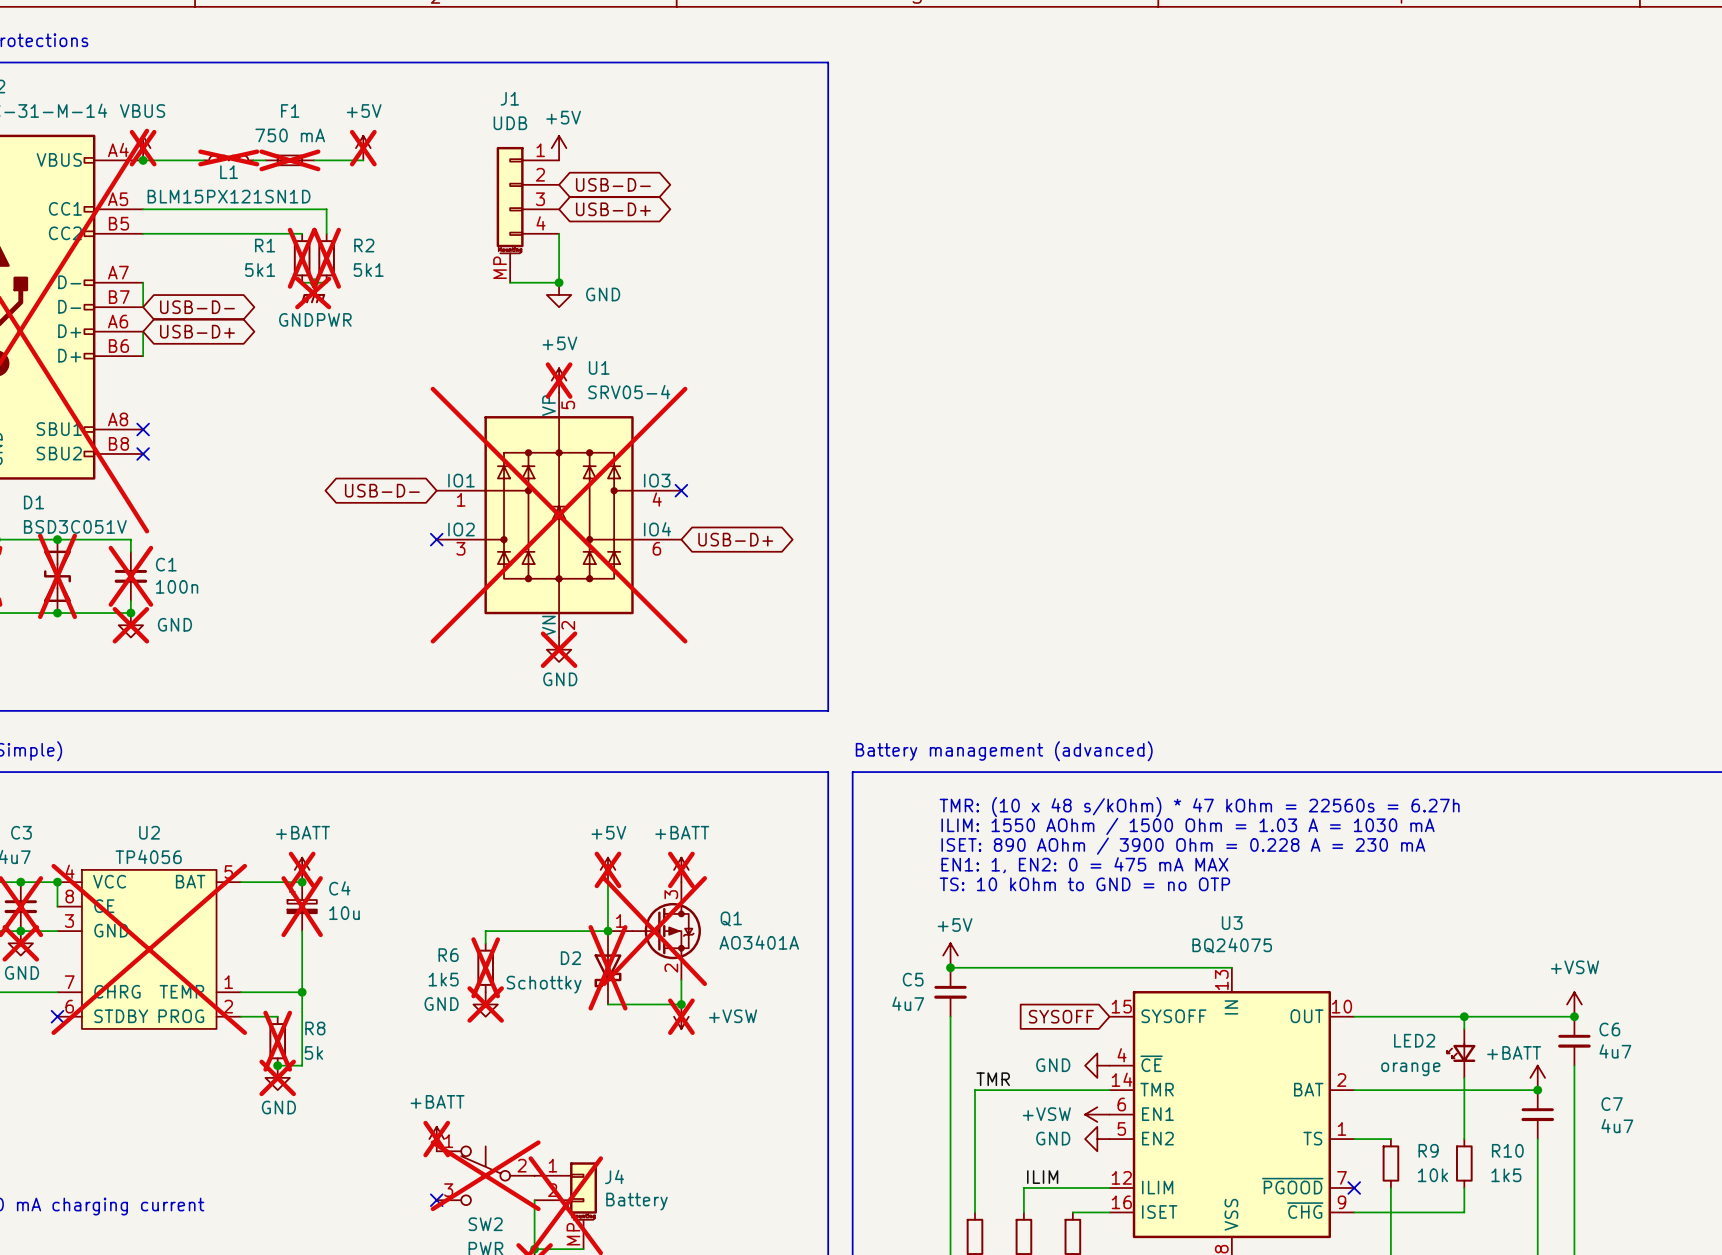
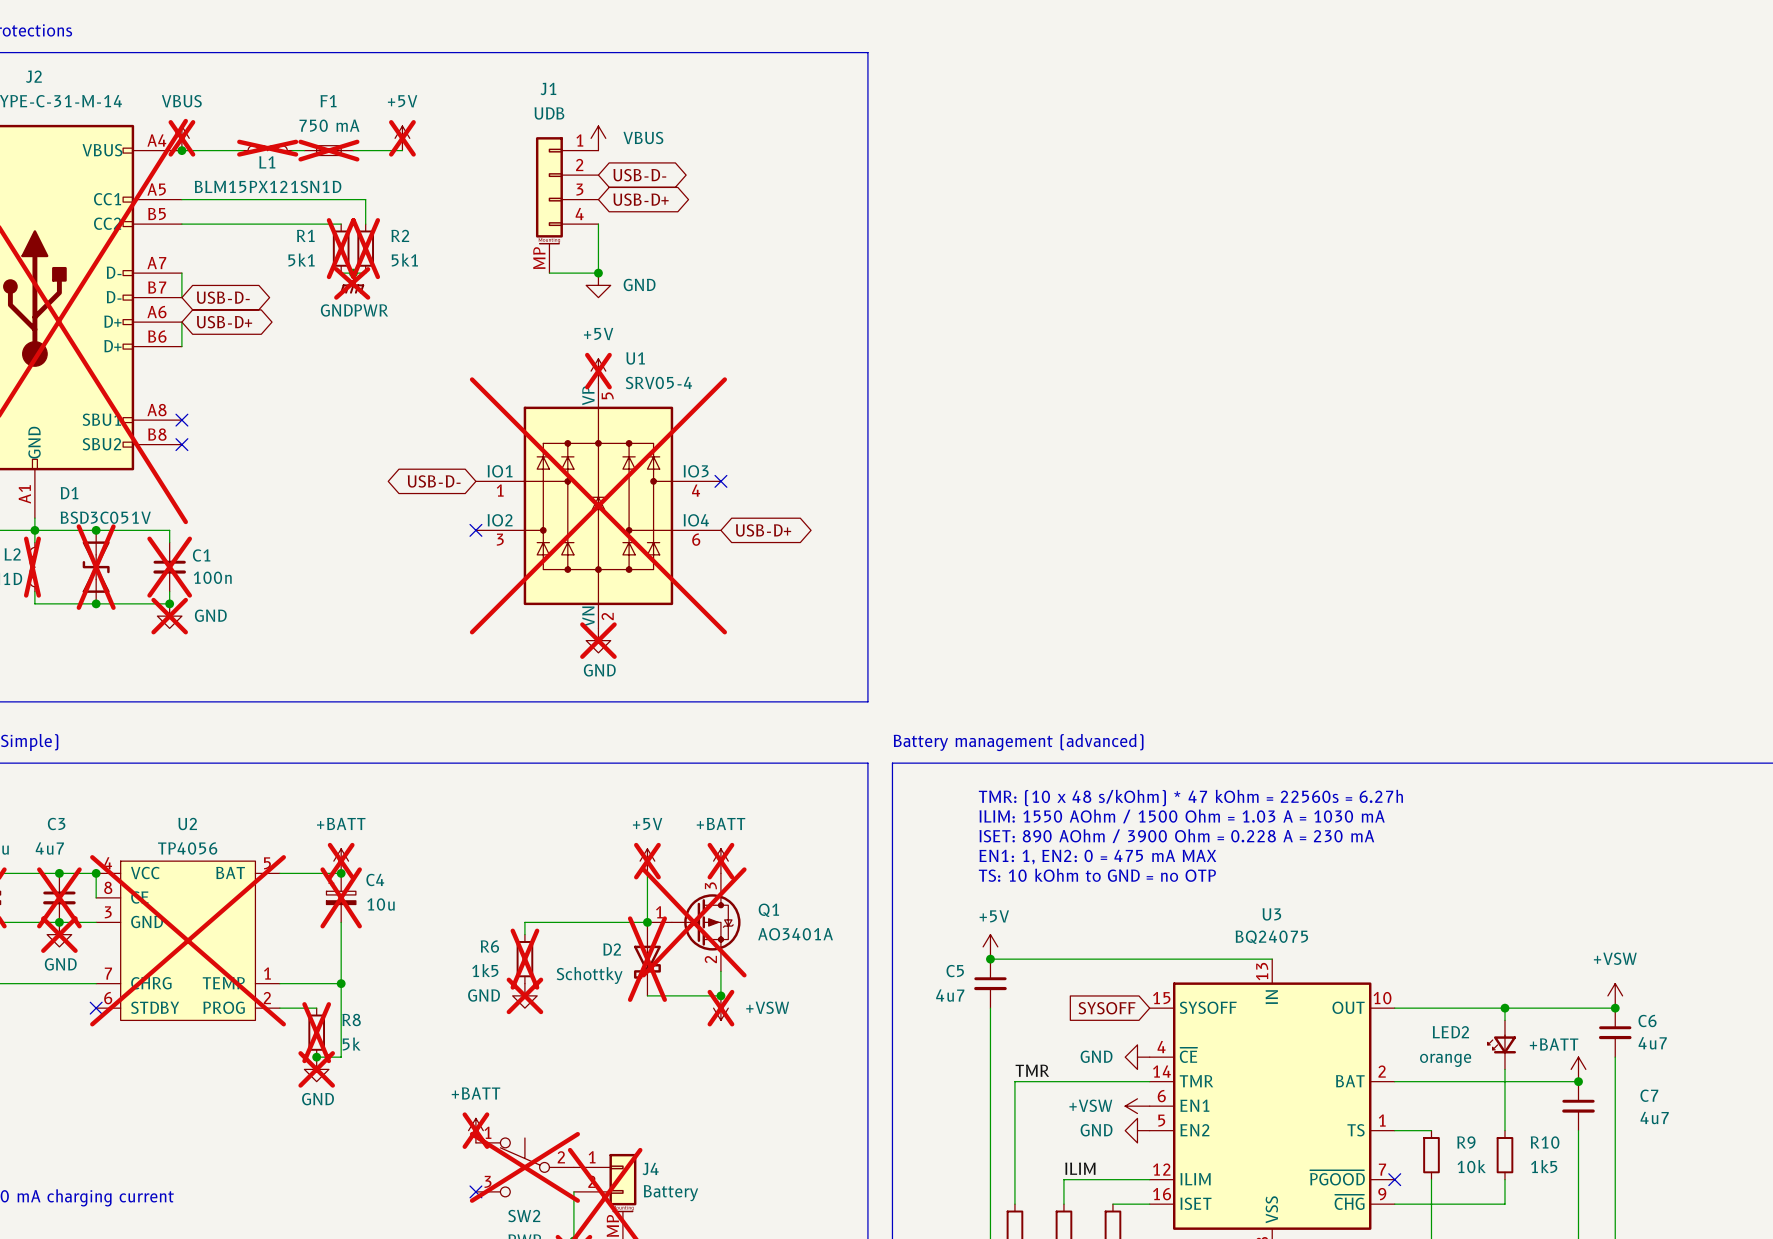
power symbol: +5V (559, 148) -> VBUS (598, 138)

